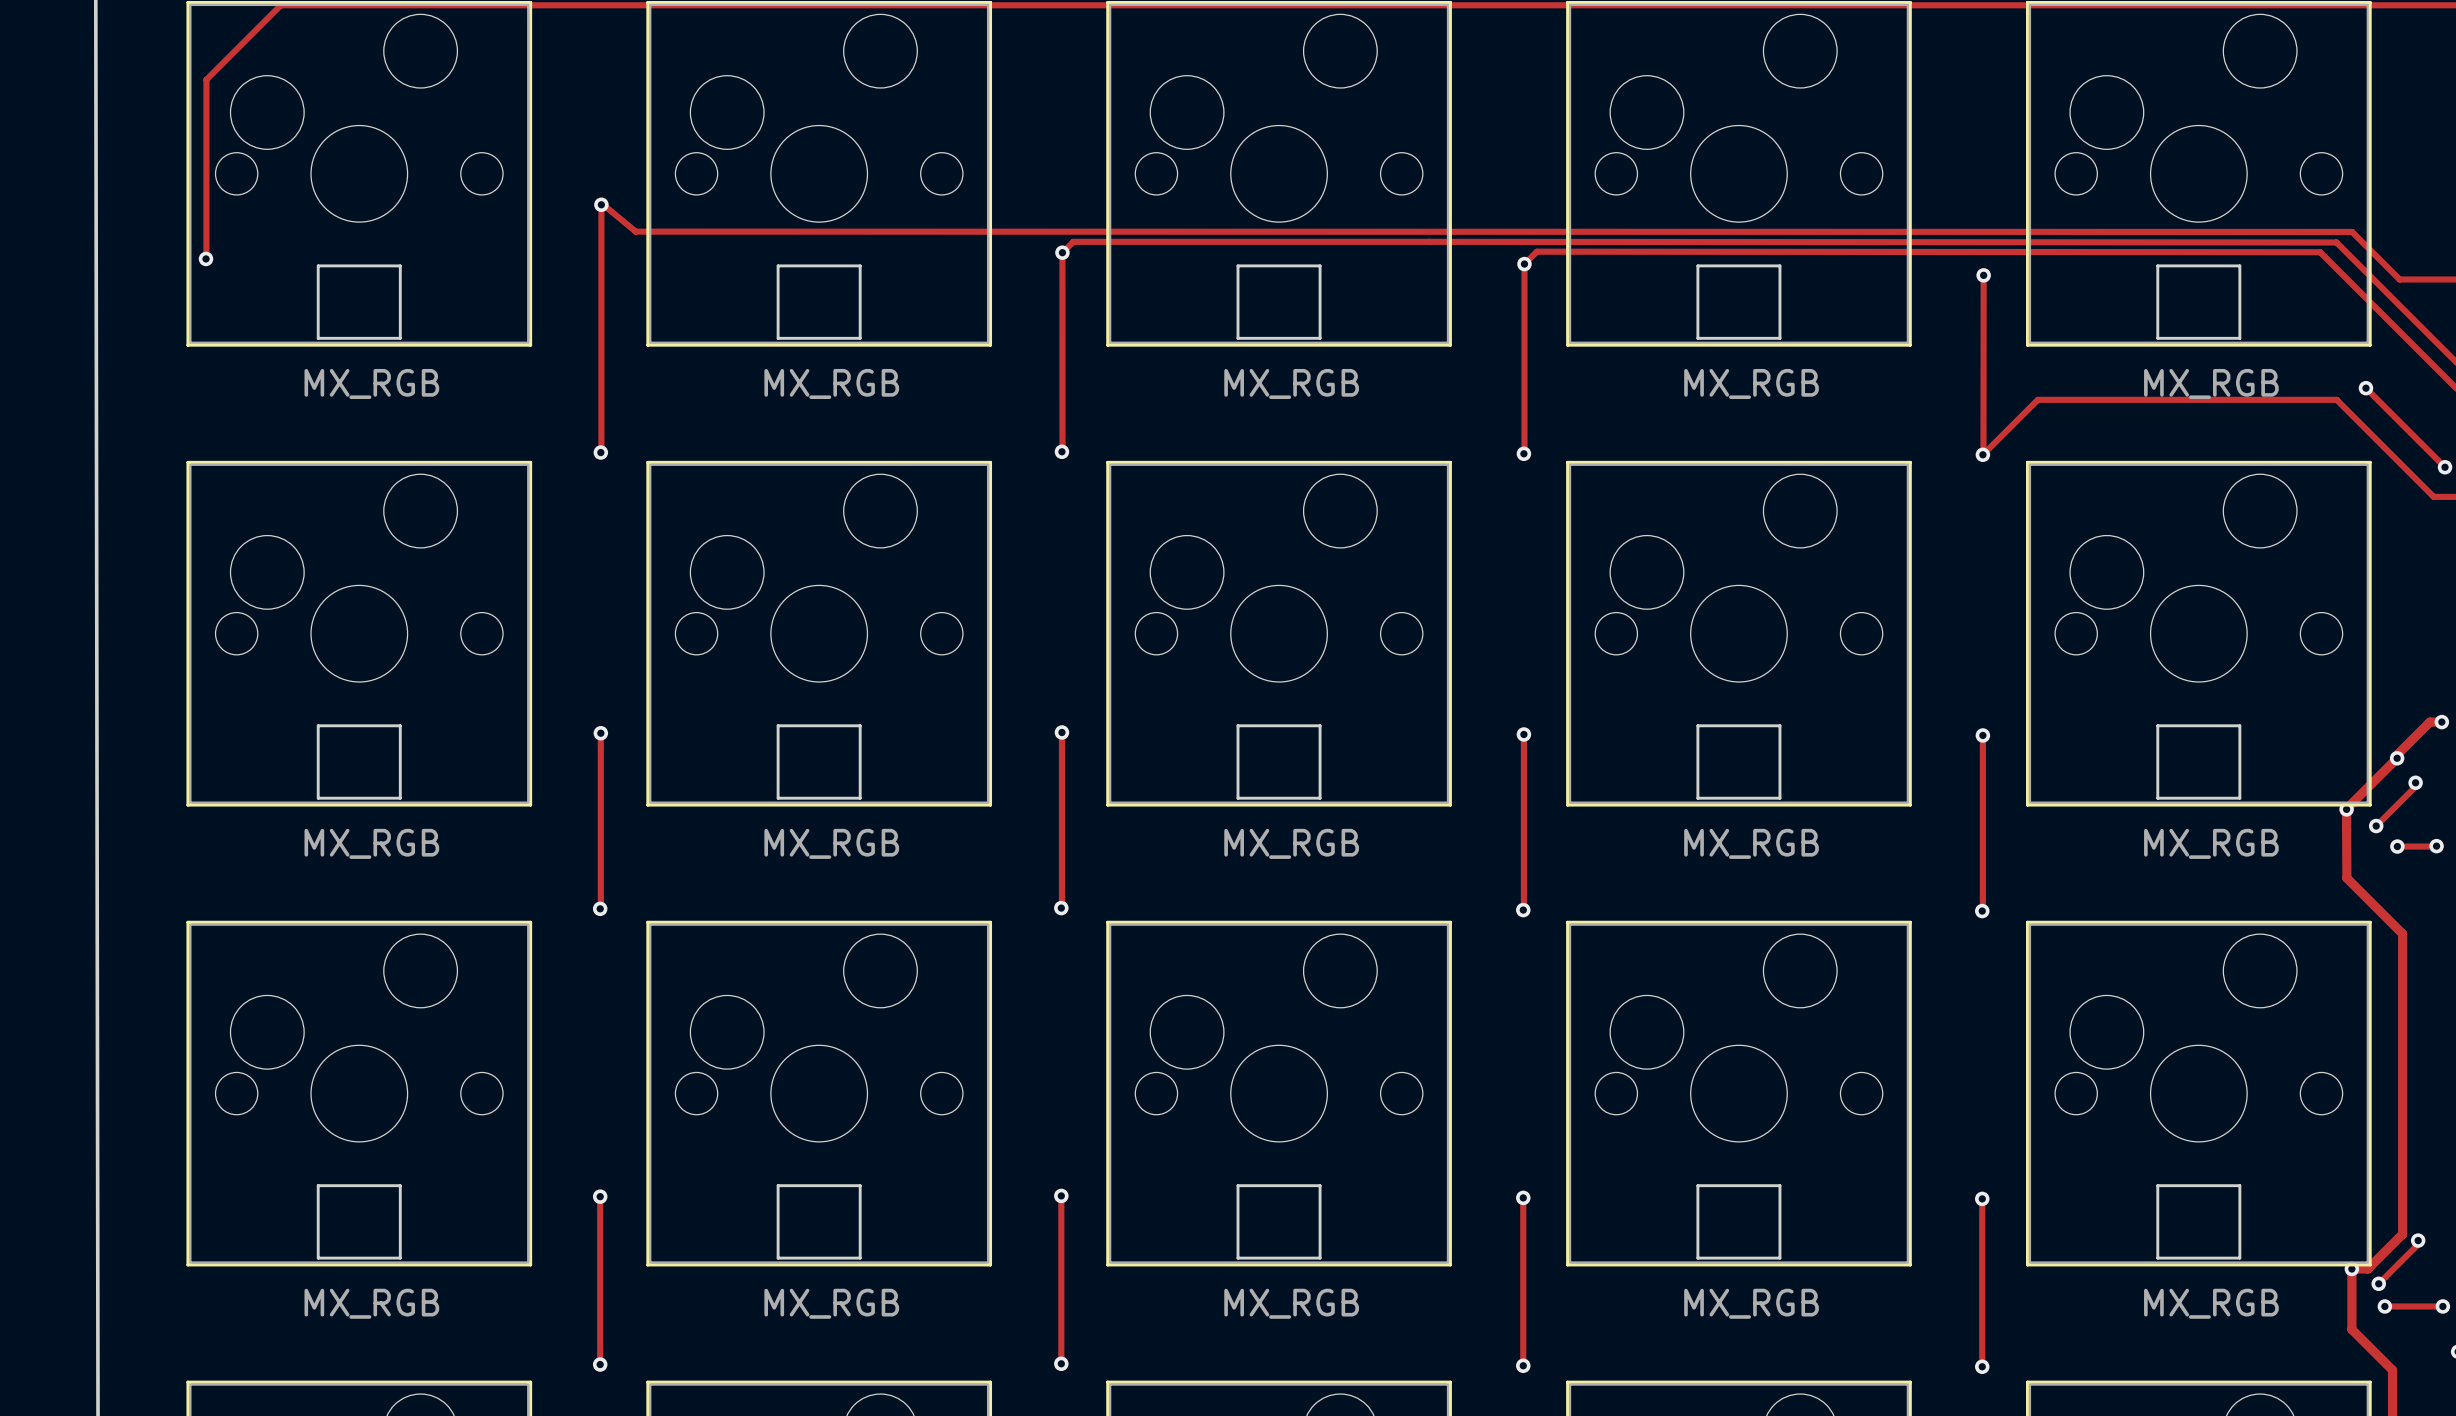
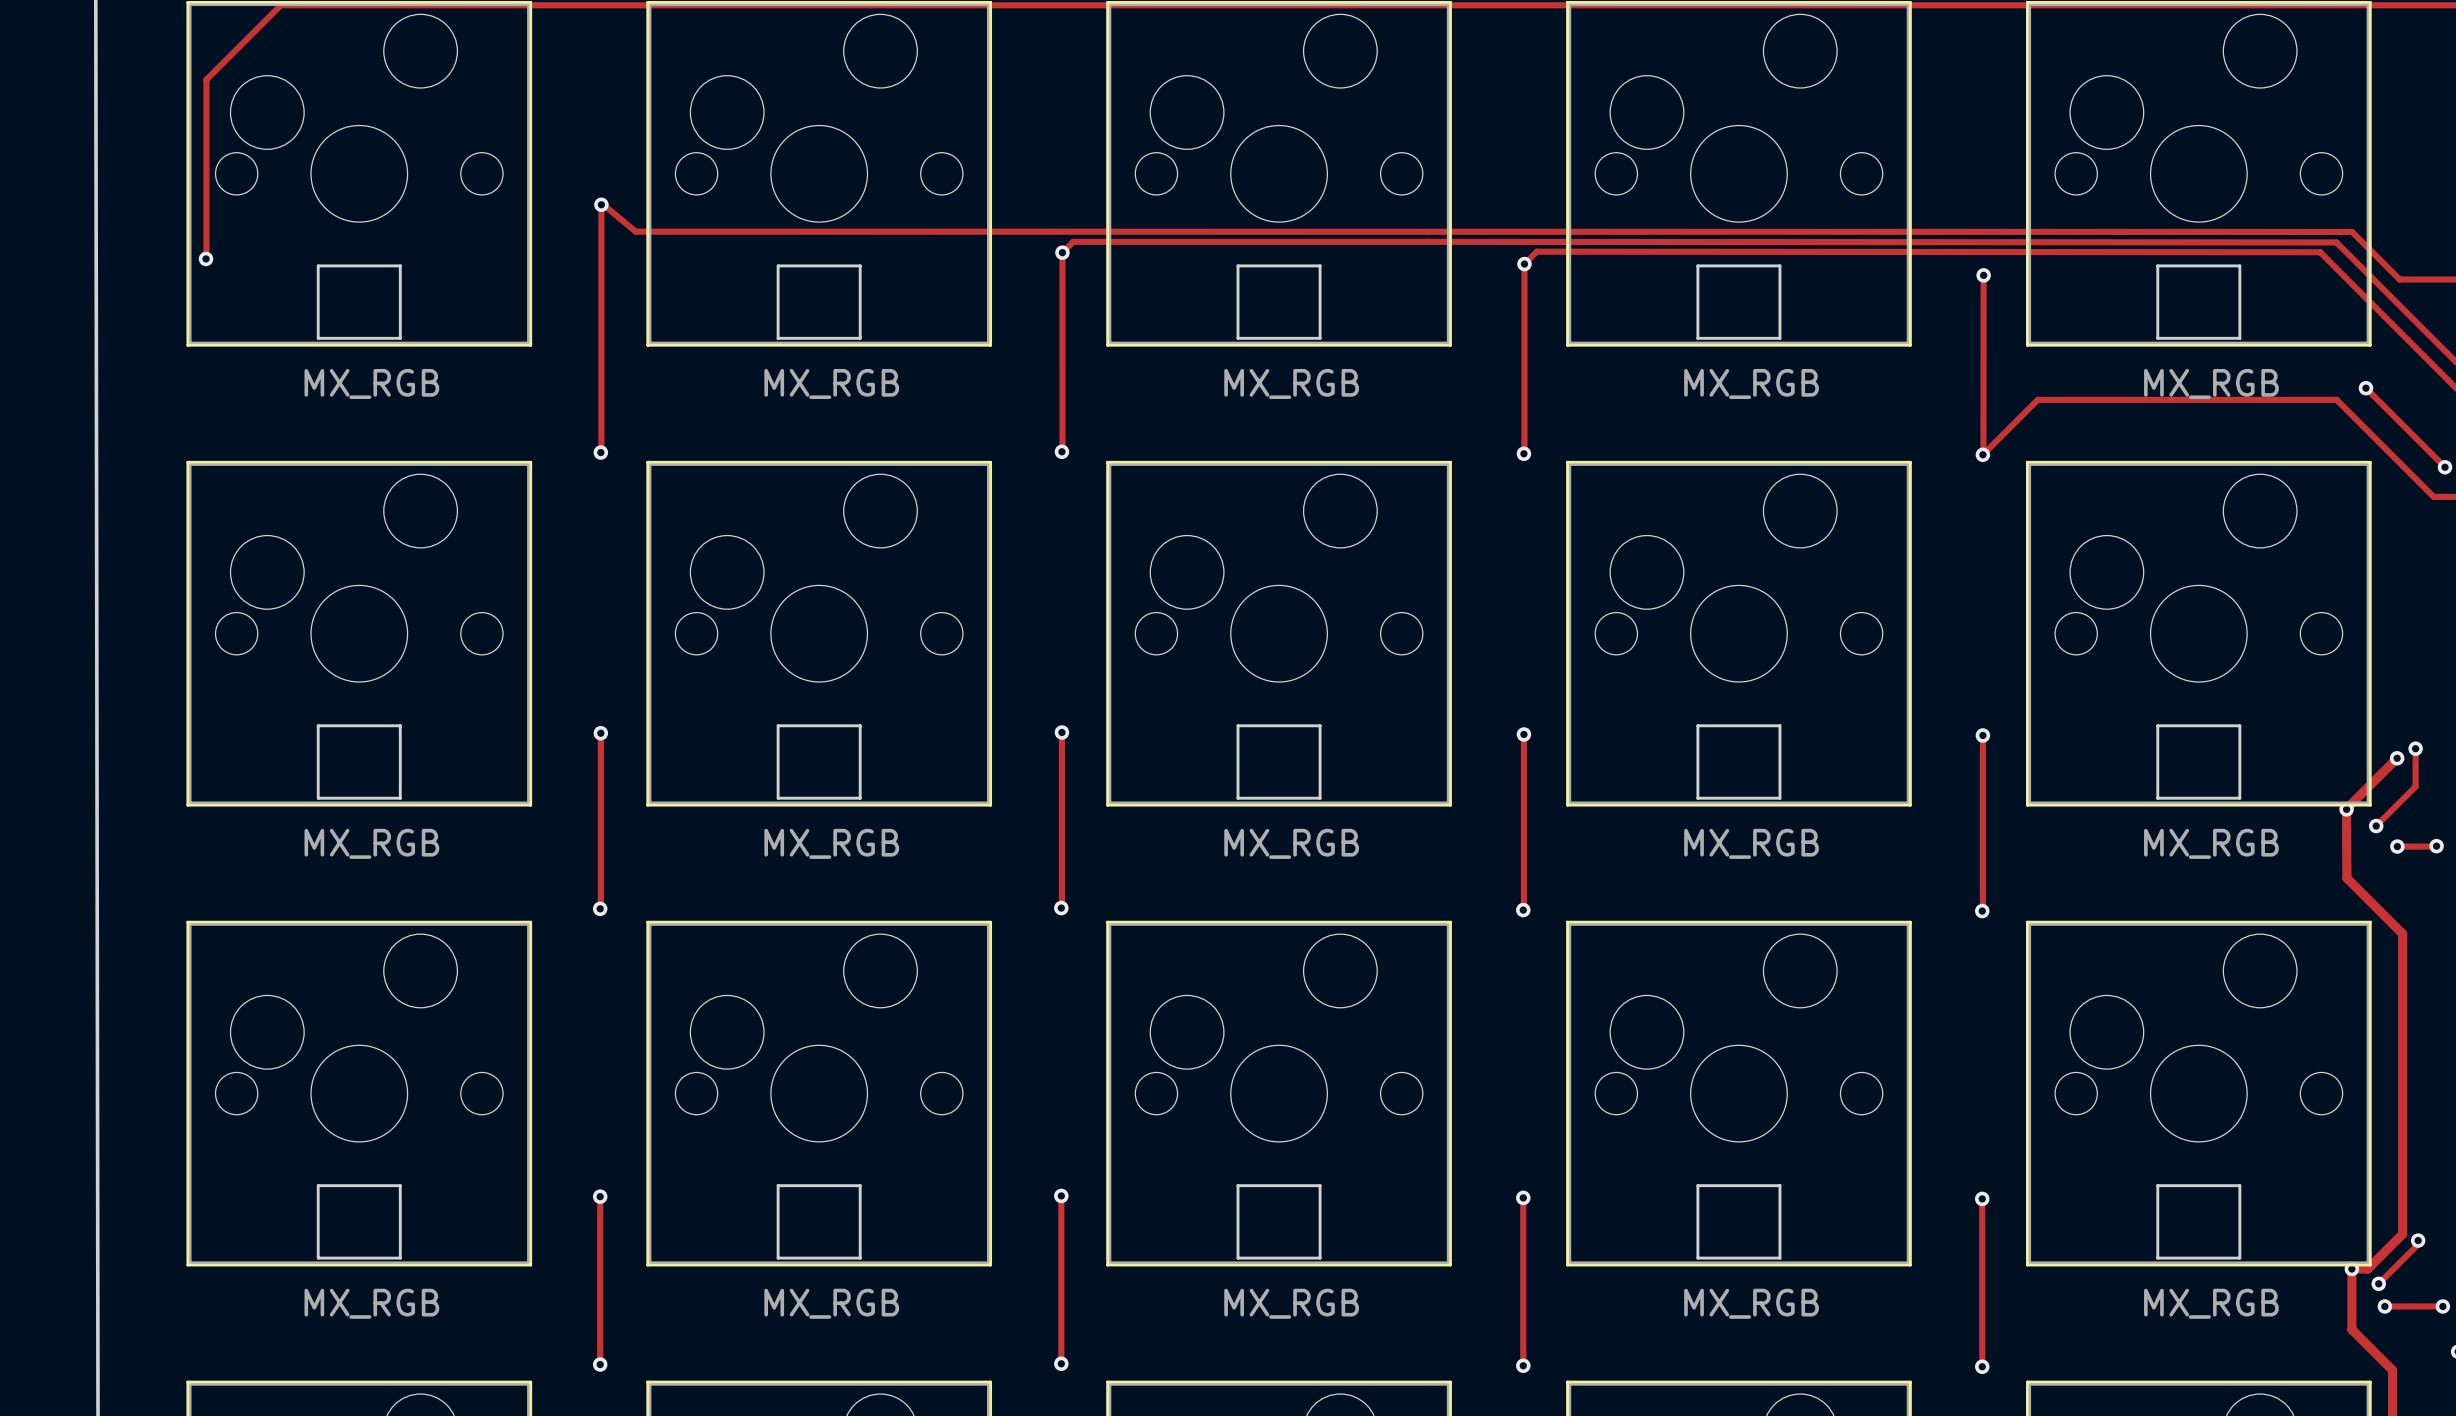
track: (2441, 722) (2429, 722) (2397, 754) (2397, 758) -> none
via: (2441, 722) -> none
track: none -> (2415, 748) (2415, 786)
via: none -> (2415, 748)
via: (2415, 782) -> none

